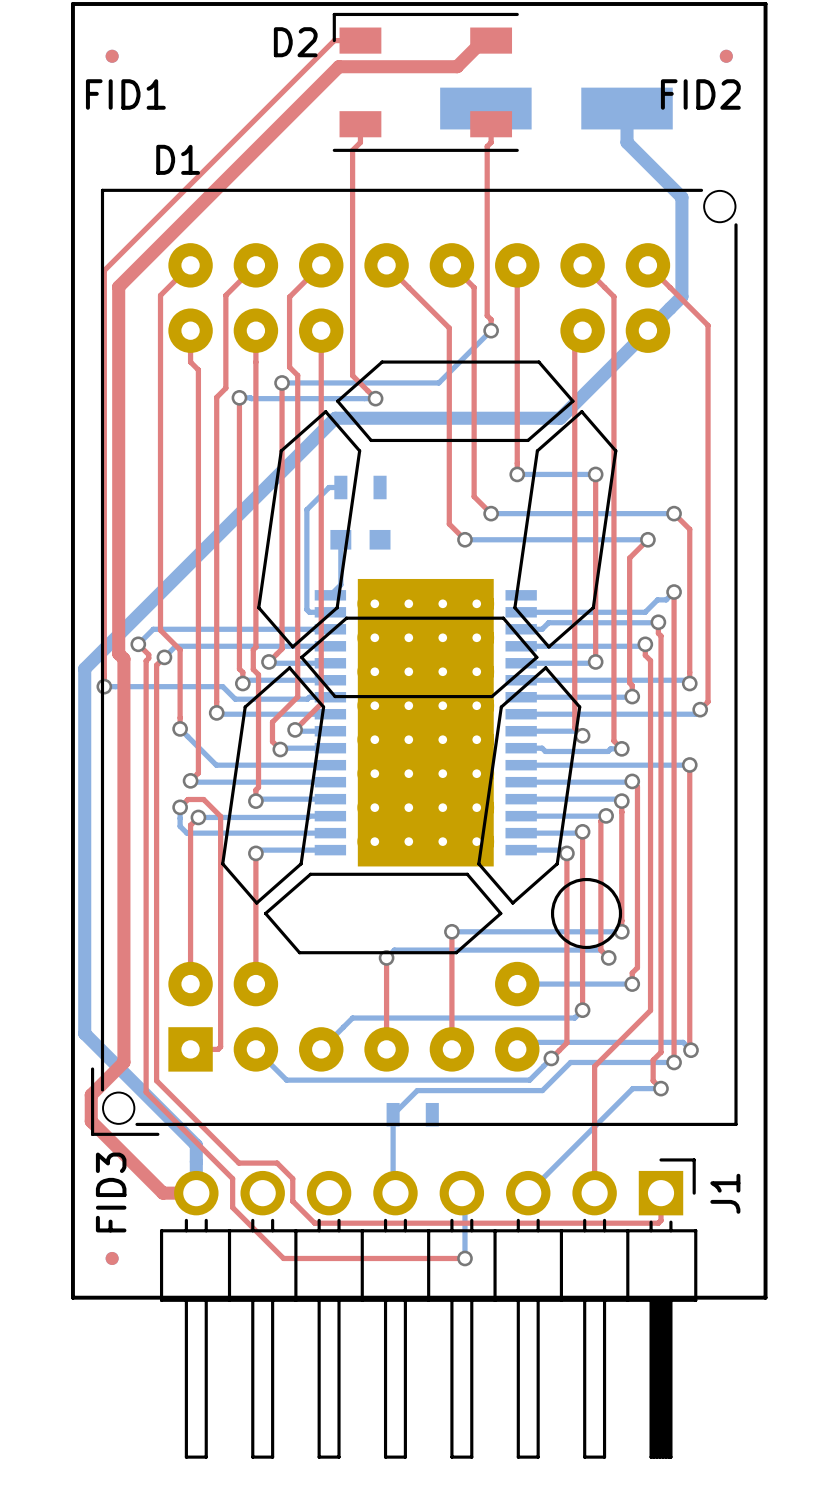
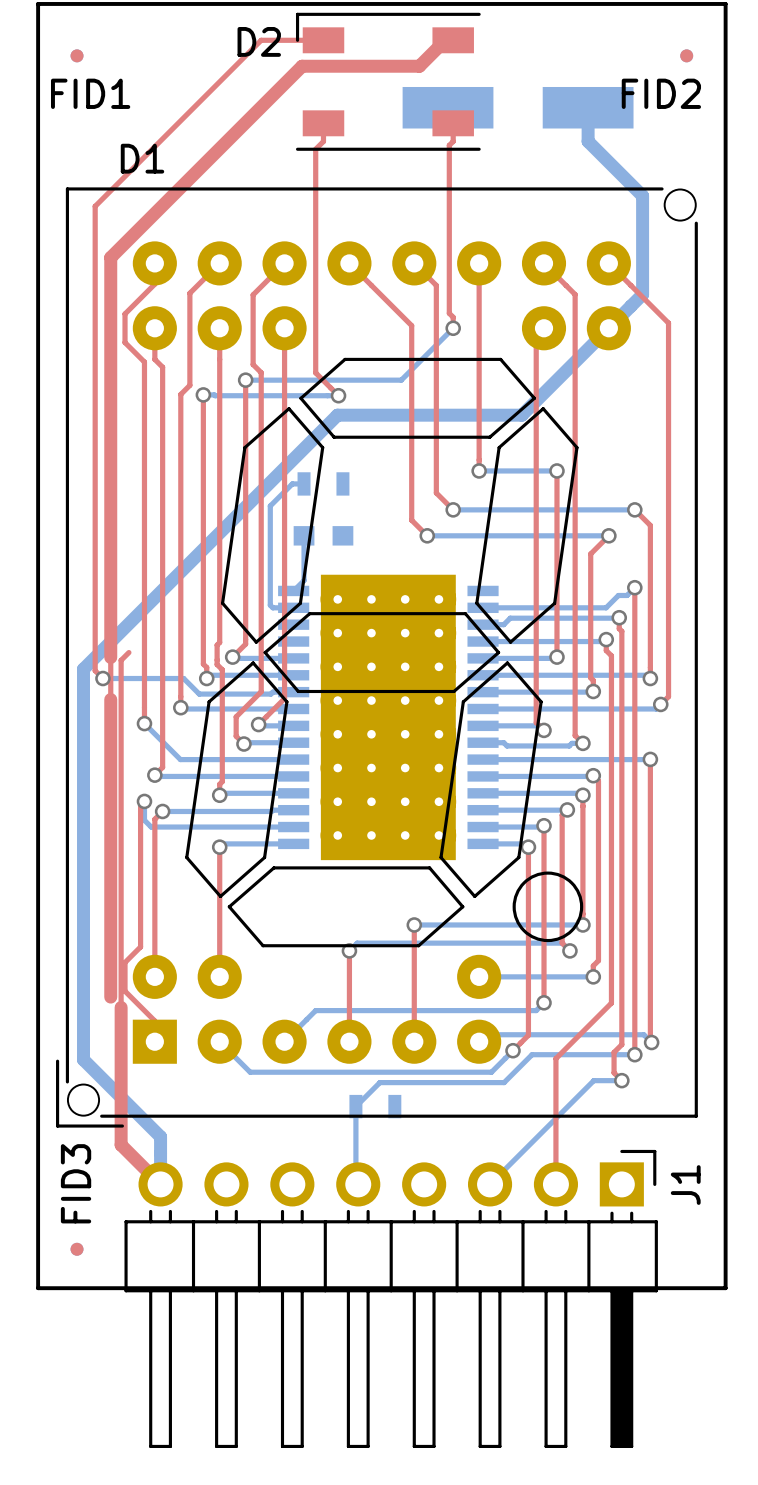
top track: (334, 40) (104, 270) (104, 686) -> (297, 40) (261, 40) (95, 206) (95, 670) (102, 678)
top track: (146, 259) (118, 286) (118, 653) (123, 658) (123, 1062) (91, 1095) (91, 1121) (163, 1193) (196, 1193) -> (110, 257) (110, 657)
top track: (190, 265) (160, 295) (160, 316) -> (154, 263) (154, 284) (125, 313)
top track: (160, 345) (160, 630) (180, 649) -> (125, 342) (144, 362) (144, 645)
bottom track: (374, 418) (335, 418) (84, 668) (84, 1033) (118, 1067) -> (337, 415) (83, 669) (83, 1059)
bottom track: (330, 629) (153, 629) (138, 644) -> none
top track: (138, 644) (148, 654) (146, 660) -> none
via: (138, 644) -> none
bottom track: (330, 646) (175, 646) (164, 657) -> none
via: (164, 657) -> none
via: none -> (102, 678)
bottom track: (104, 686) (222, 686) -> (102, 678) (183, 678) (186, 681)
via: (104, 686) -> none
top track width: thin (146, 704) (146, 1004) -> thick (110, 699) (110, 997)
top track: (180, 807) (187, 799) (203, 799) (220, 816) (220, 1046) (218, 1049) (190, 1049) -> (140, 800) (140, 946) (125, 962) (125, 991) (154, 1021) (154, 1041)
top track: (146, 1004) (146, 1092) (232, 1178) (232, 1207) (283, 1258) (464, 1258) -> none
top track width: thin (156, 1014) (156, 1080) -> thick (121, 1007) (121, 1072)
top track: (156, 1080) (238, 1163) (277, 1163) (292, 1178) (292, 1201) (314, 1223) (658, 1223) (661, 1220) (661, 1193) -> (121, 1072) (121, 1144) (160, 1184)
bottom track: (461, 1193) (464, 1196) (464, 1258) -> none
via: (464, 1258) -> none

